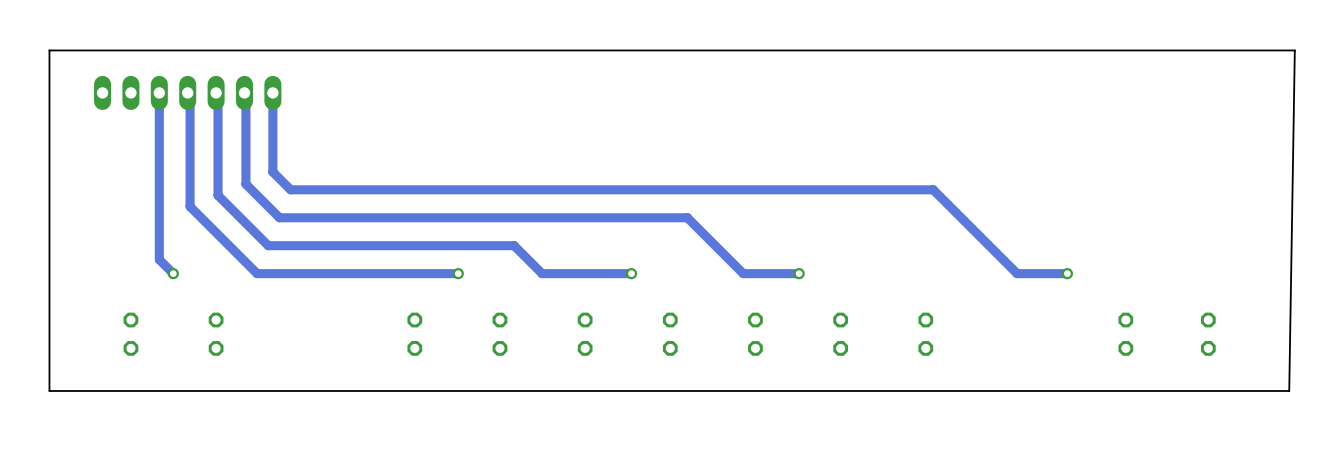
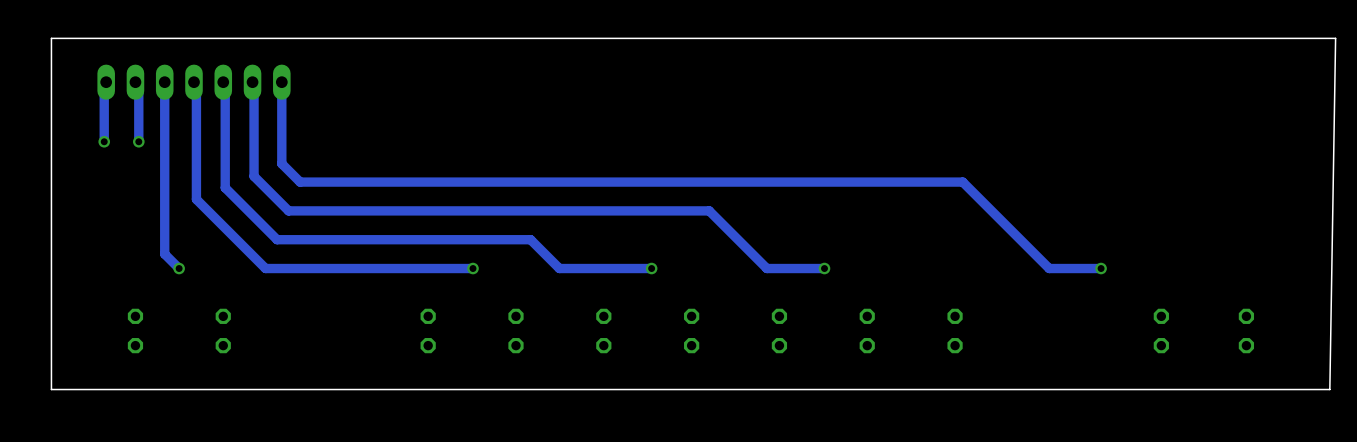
track: none -> (106, 82) (104, 82) (104, 141)
track: none -> (135, 82) (138, 85) (138, 141)
via: none -> (104, 141)
via: none -> (138, 141)

